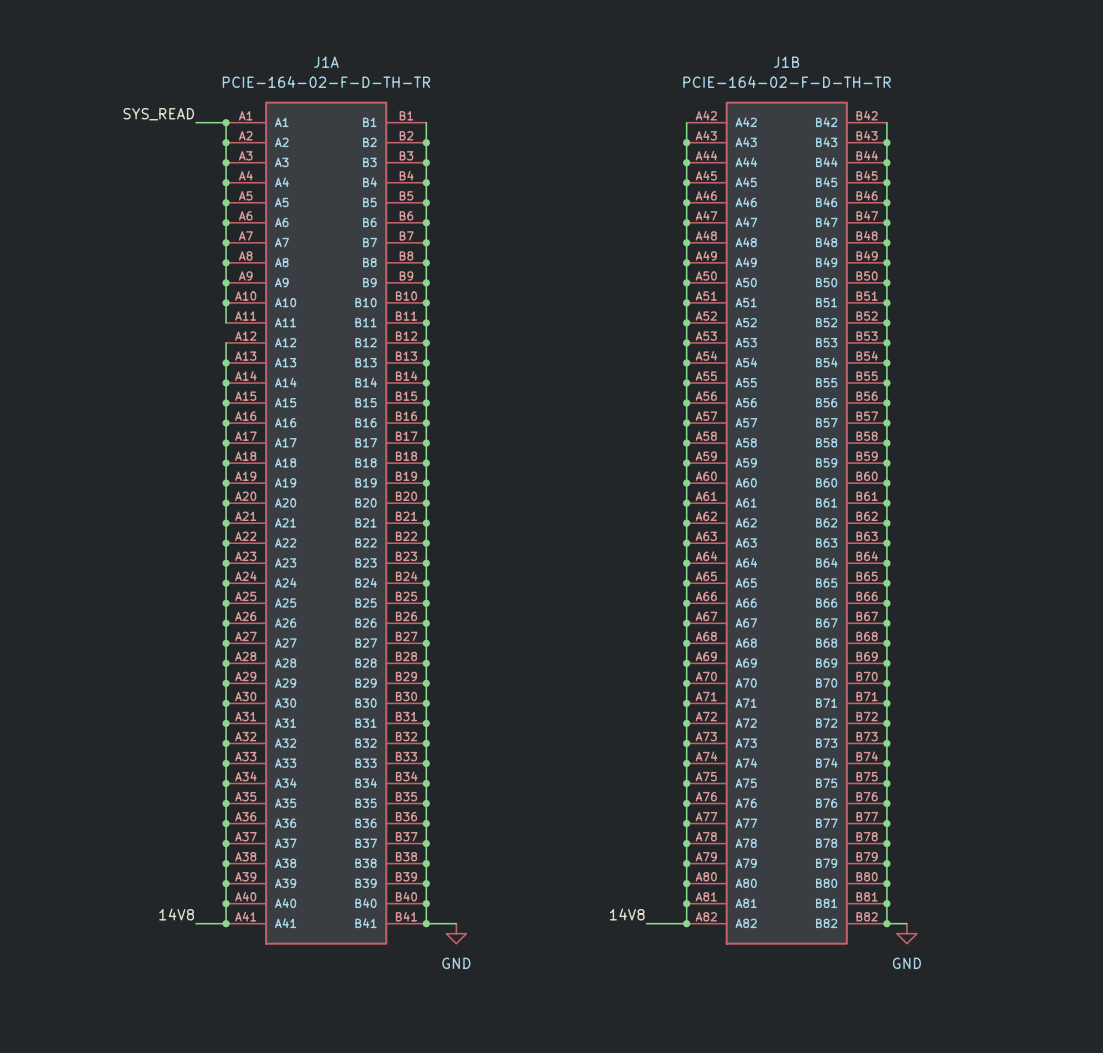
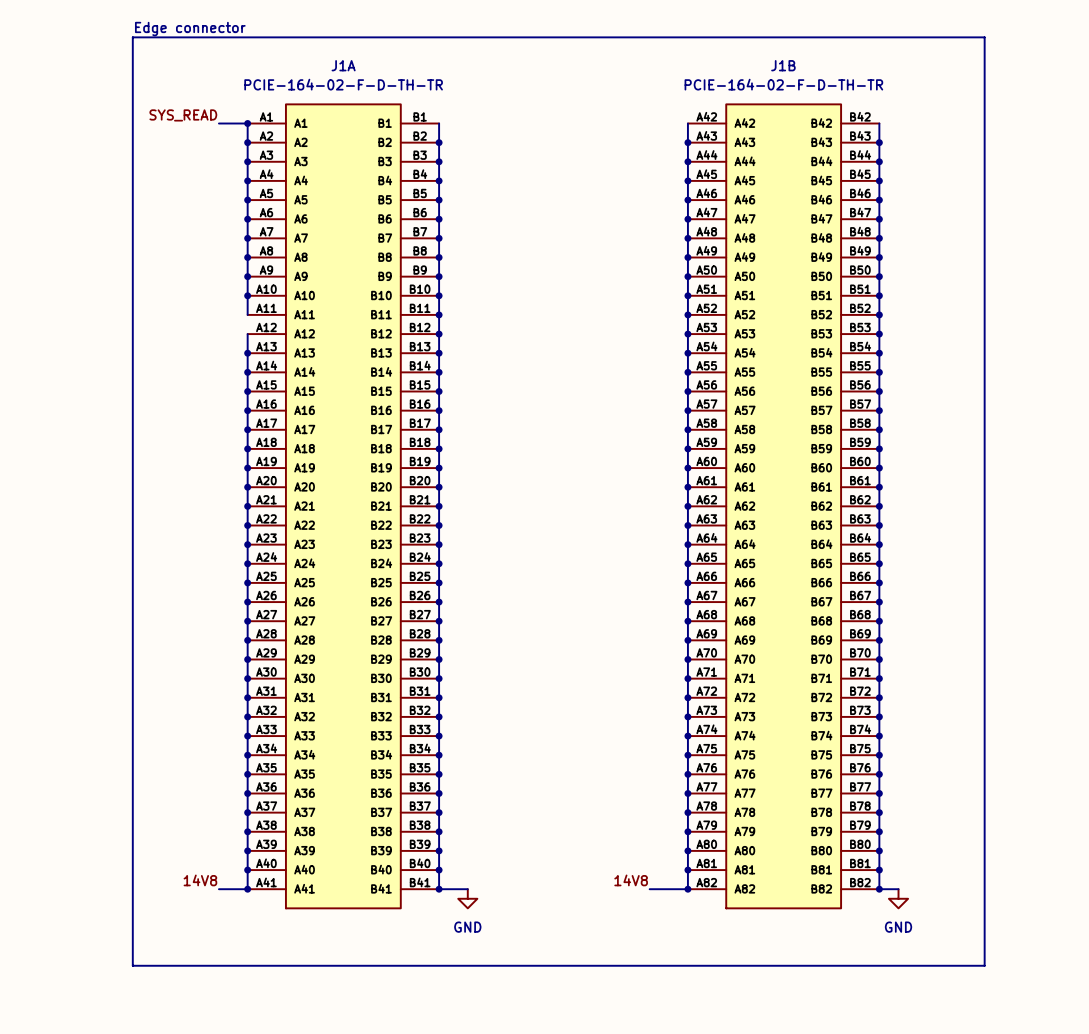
text: none -> Edge connector (190, 29)
line: none -> (132, 37) (984, 37) (984, 965) (132, 965) (132, 37)

